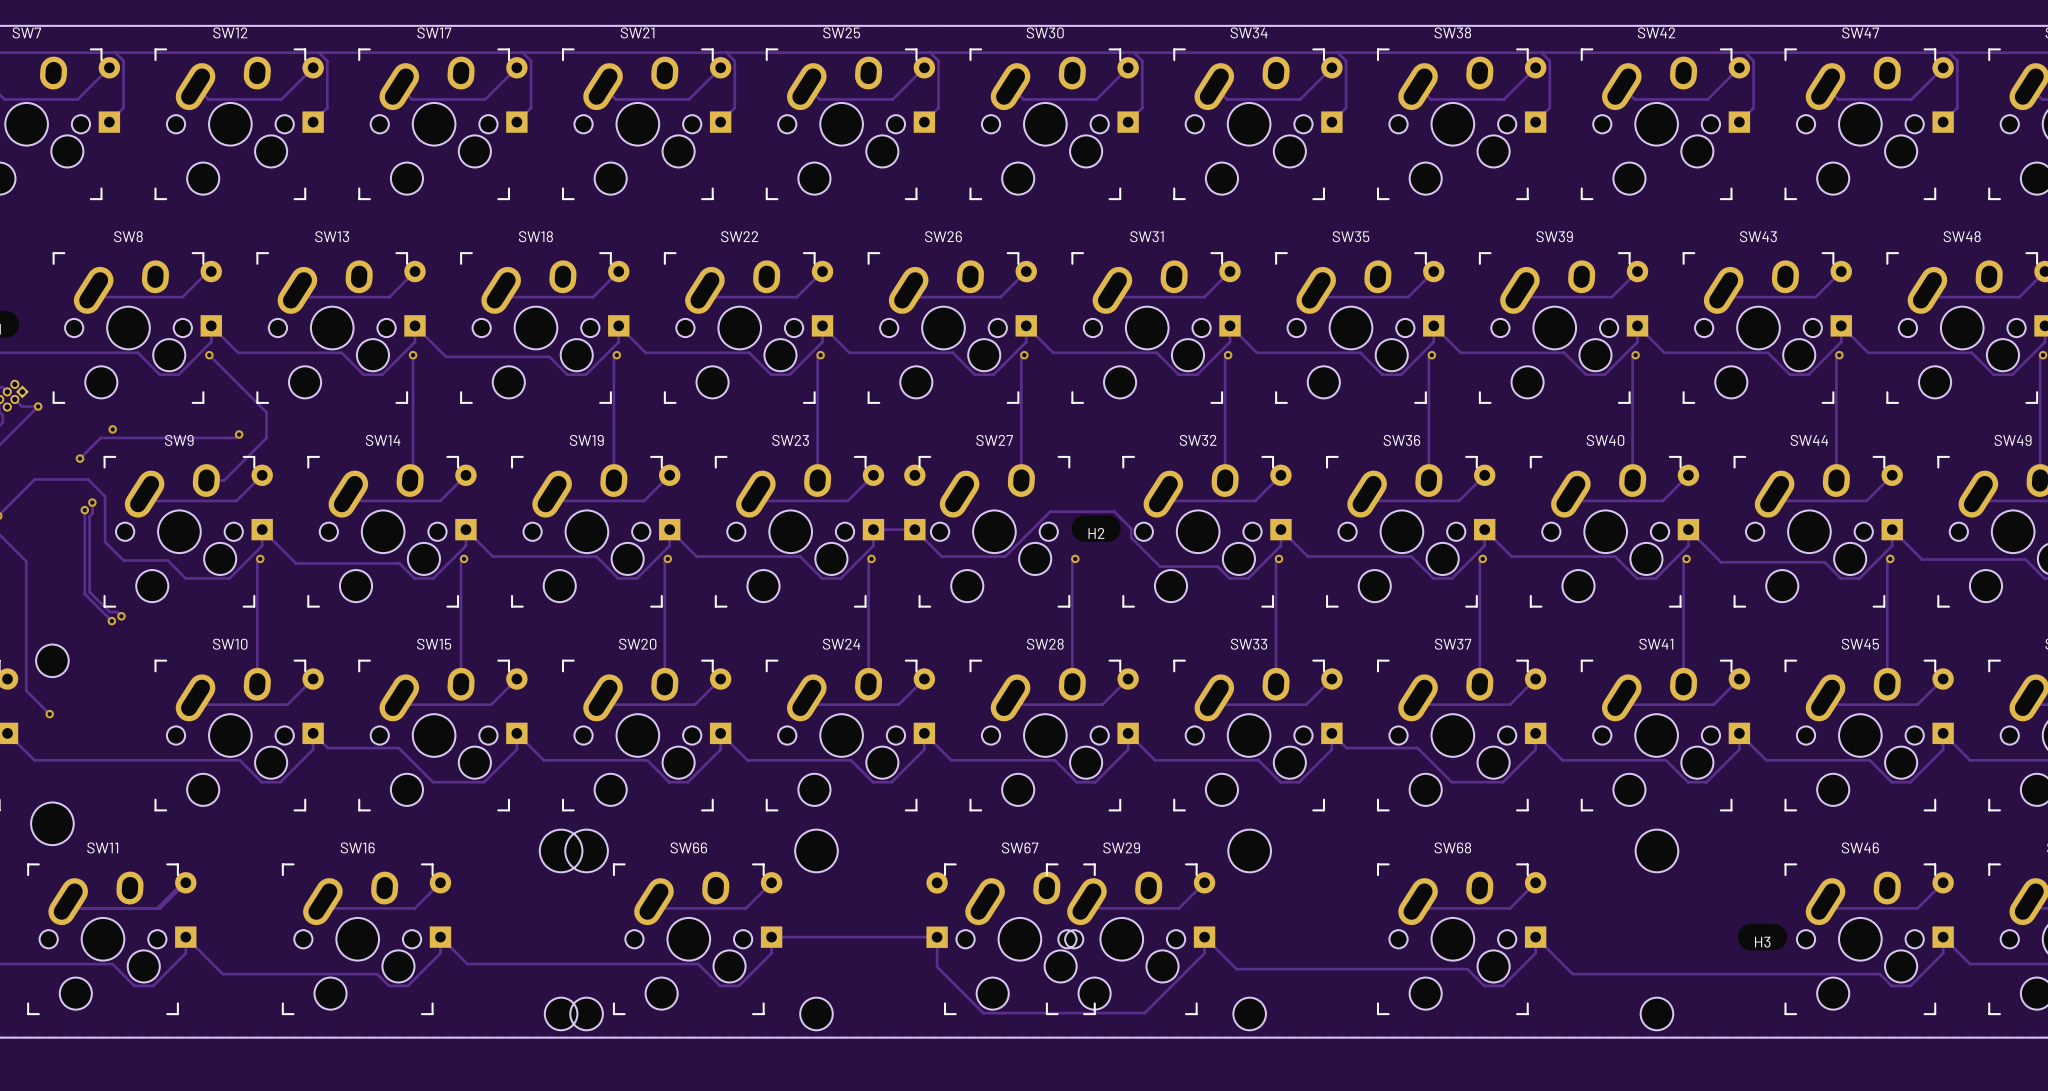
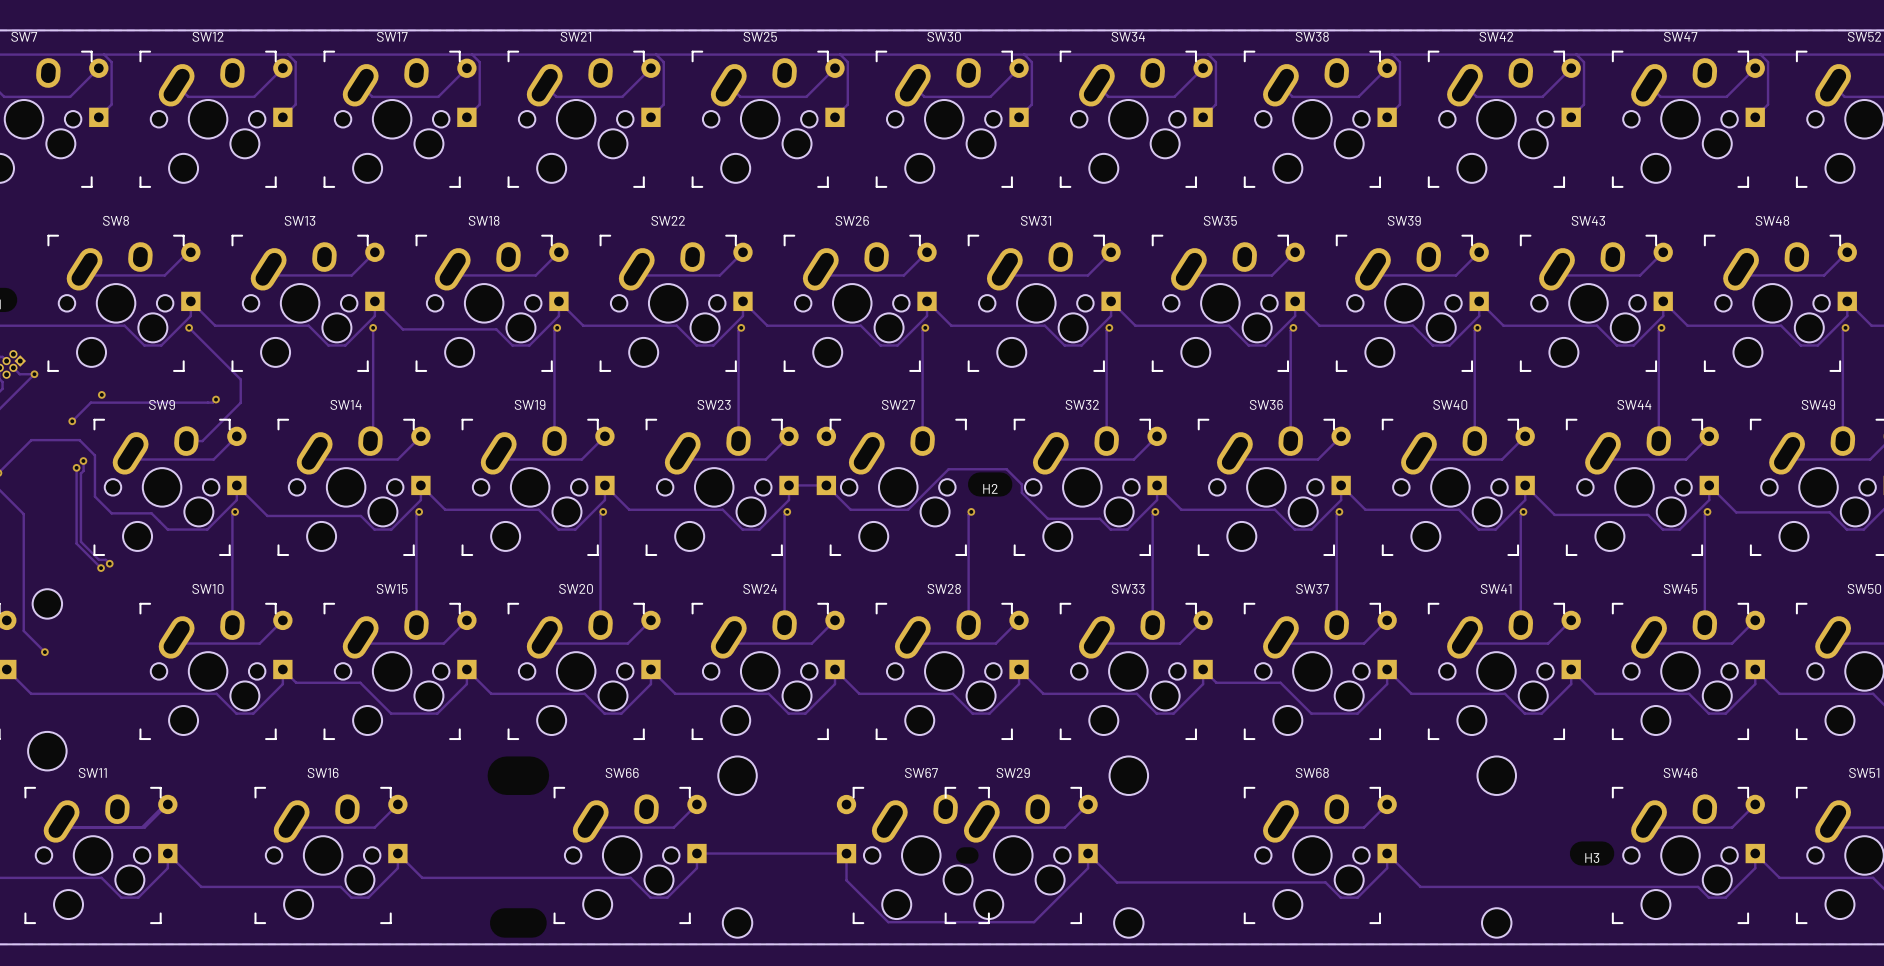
SW66 footprint: [539, 829, 838, 1031] -> [487, 756, 757, 938]
SW29 footprint: [565, 829, 1679, 1031] -> [944, 756, 1516, 938]
SW67 footprint: [944, 863, 1096, 1015] -> [852, 787, 990, 924]

